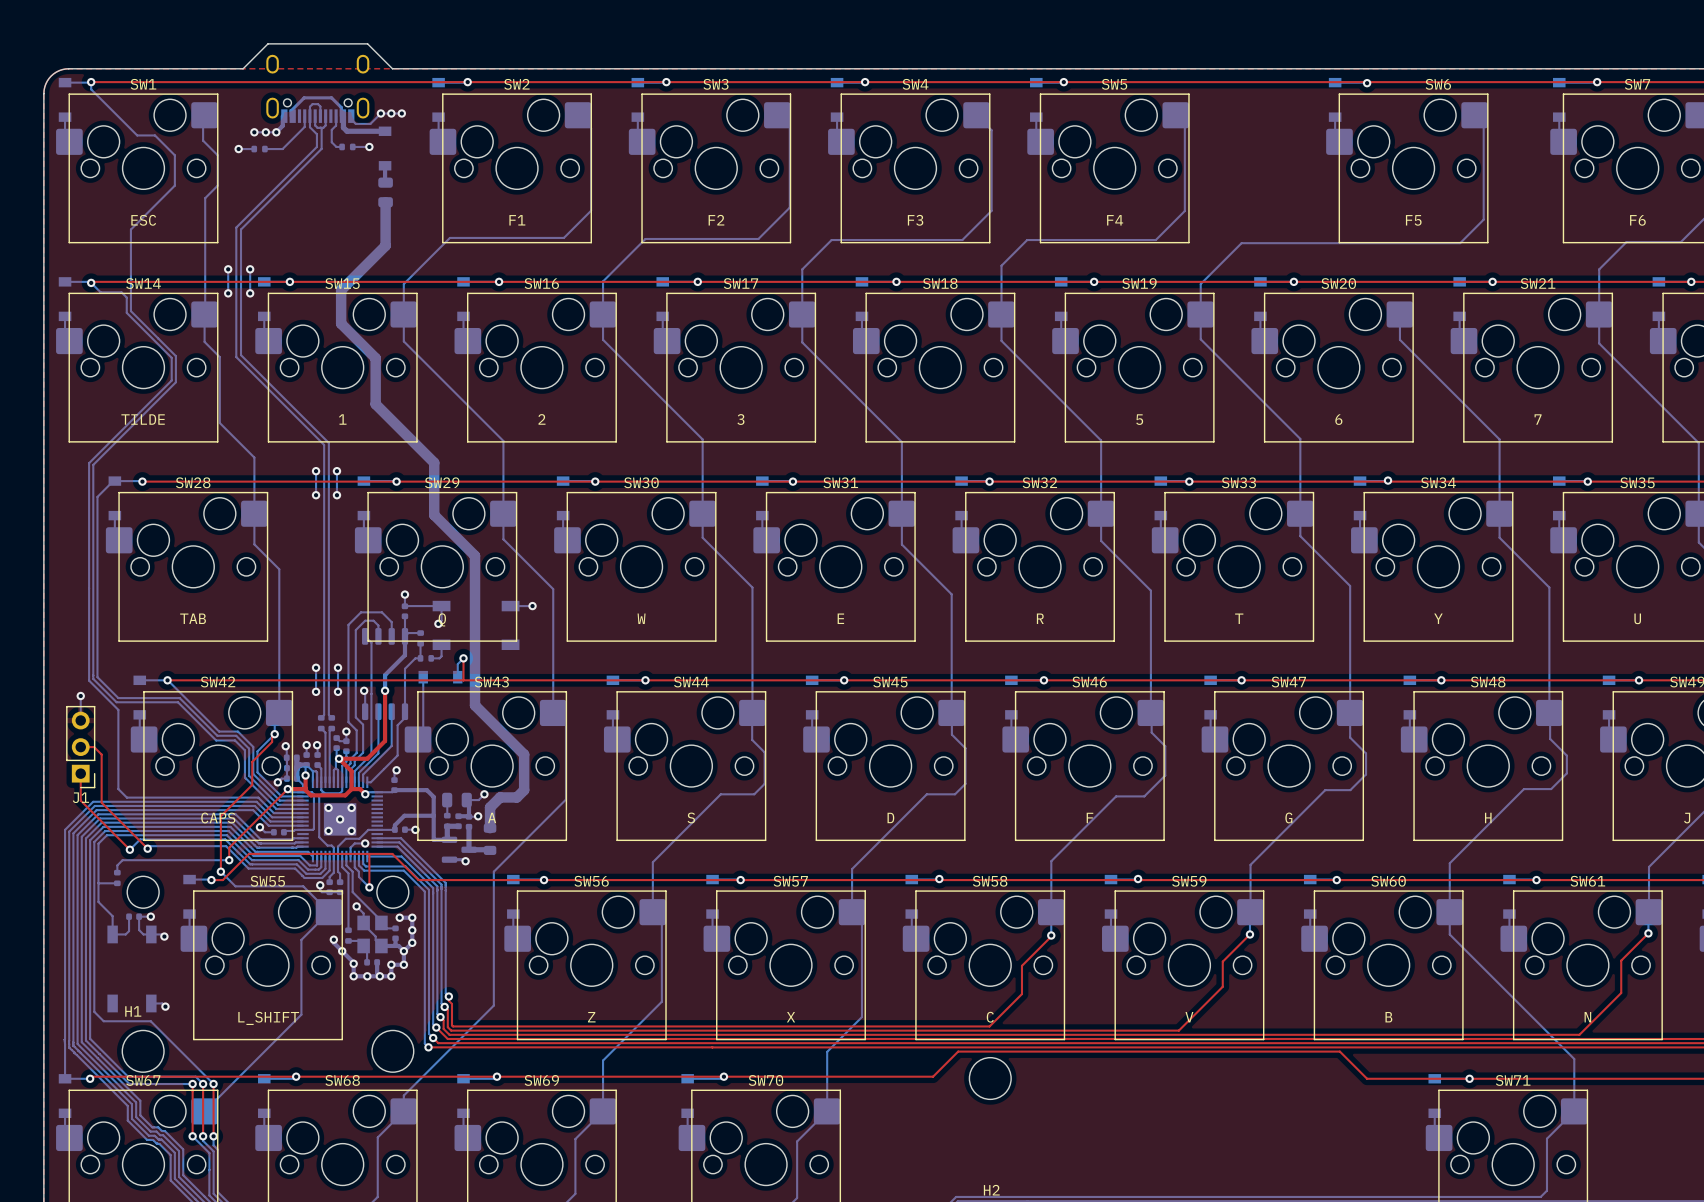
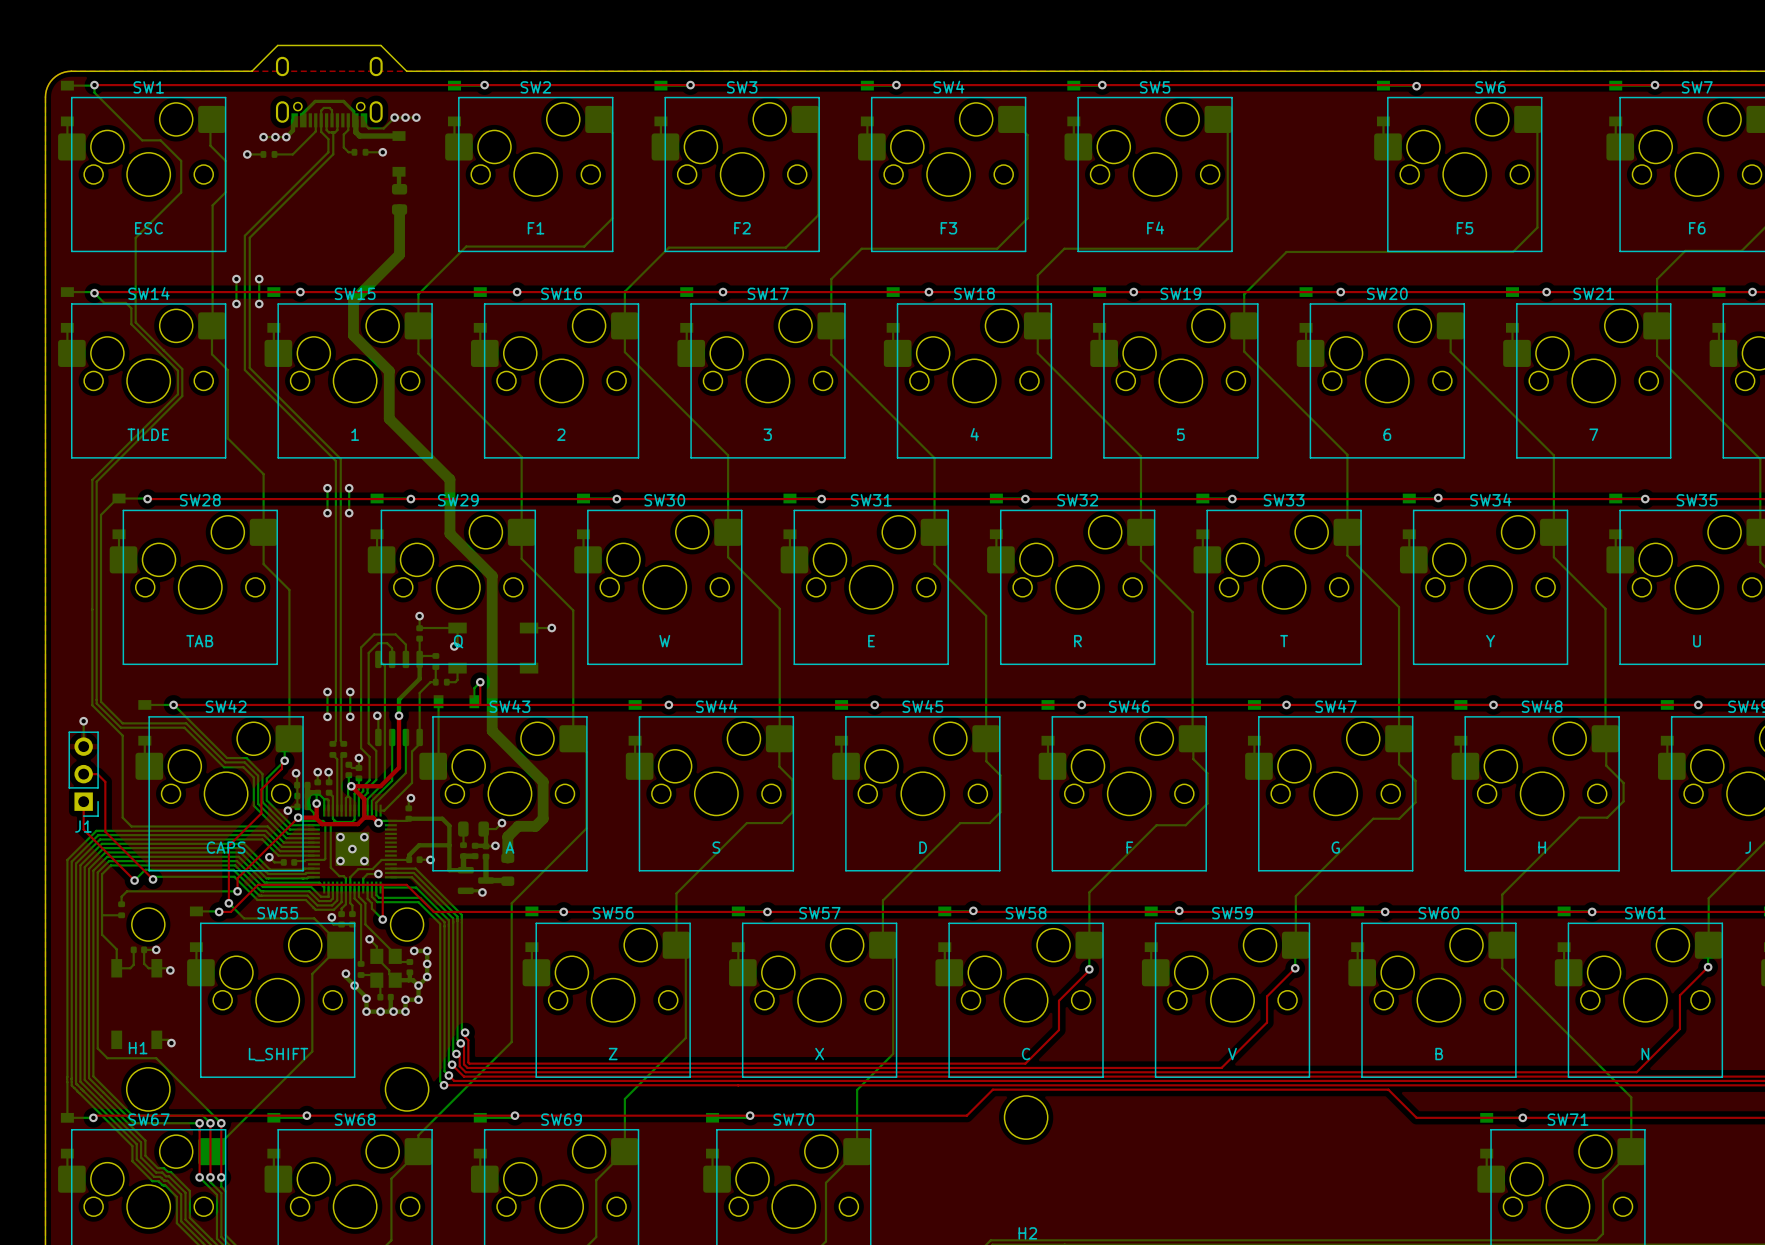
SW18 value: none -> 4 (974, 434)

